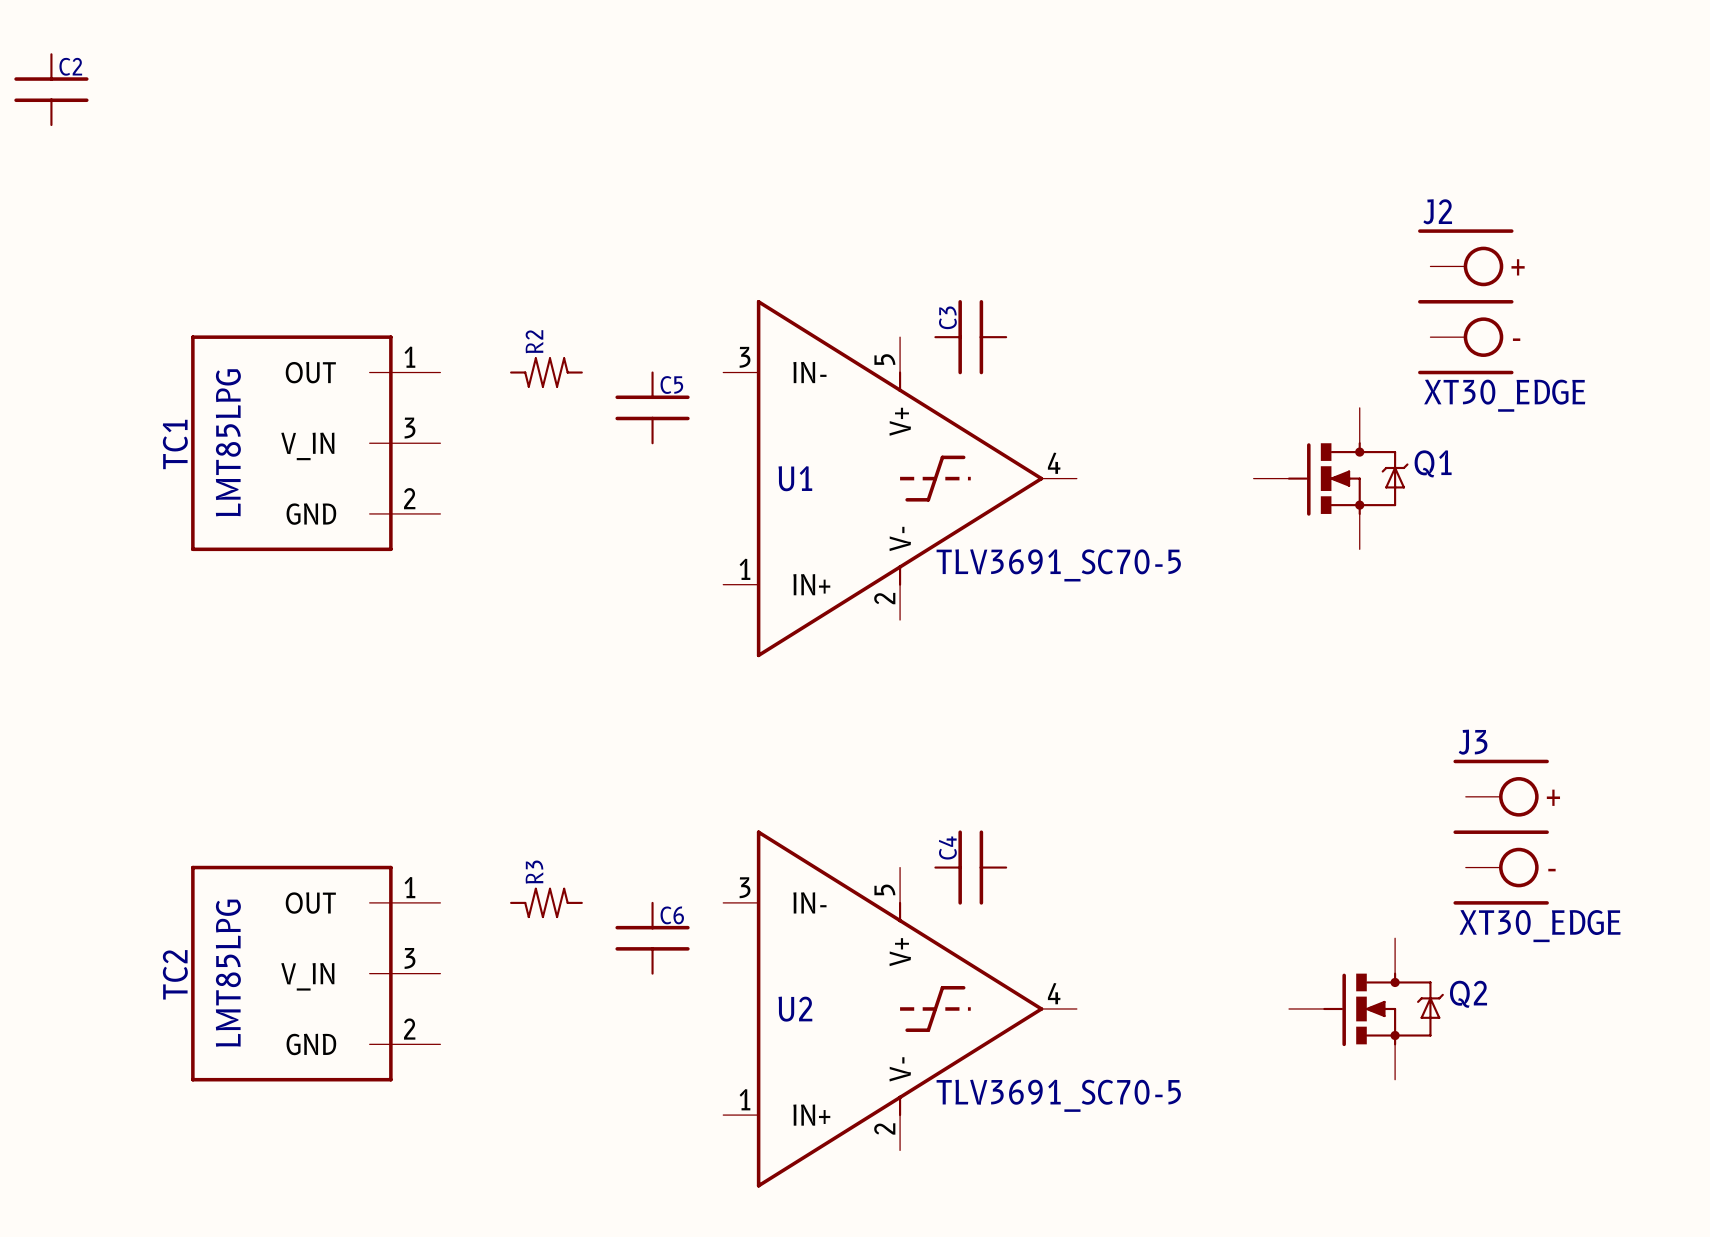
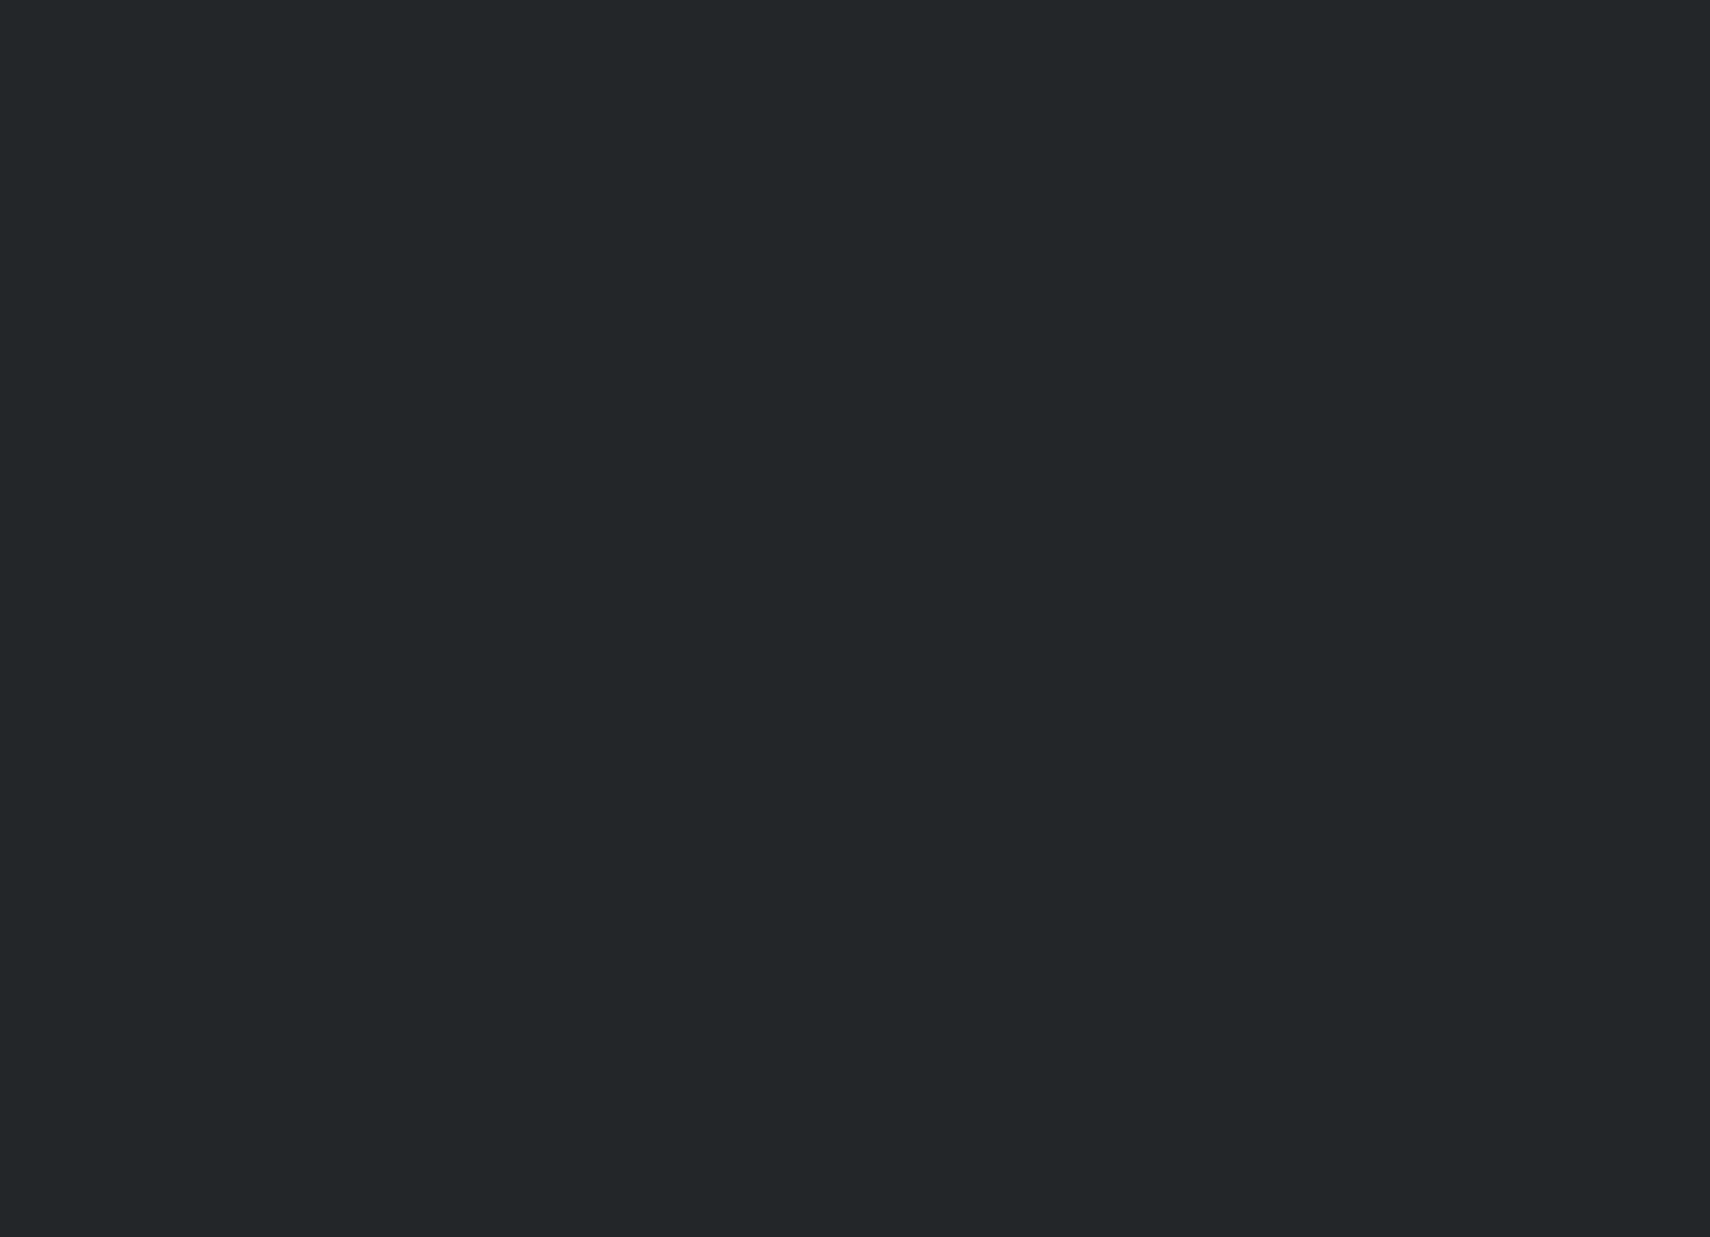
C2: (51, 89) -> none
J2: XT30_EDGE (1465, 301) -> none
C3: (970, 337) -> none
R2: (546, 372) -> none
C5: (652, 407) -> none
TC1: LMT85LPG (315, 443) -> none
U1: TLV3691_SC70-5 (900, 478) -> none
Q1: (1331, 478) -> none
J3: XT30_EDGE (1501, 832) -> none
C4: (970, 867) -> none
R3: (546, 902) -> none
C6: (652, 938) -> none
TC2: LMT85LPG (315, 973) -> none
U2: TLV3691_SC70-5 (900, 1008) -> none
Q2: (1366, 1008) -> none

